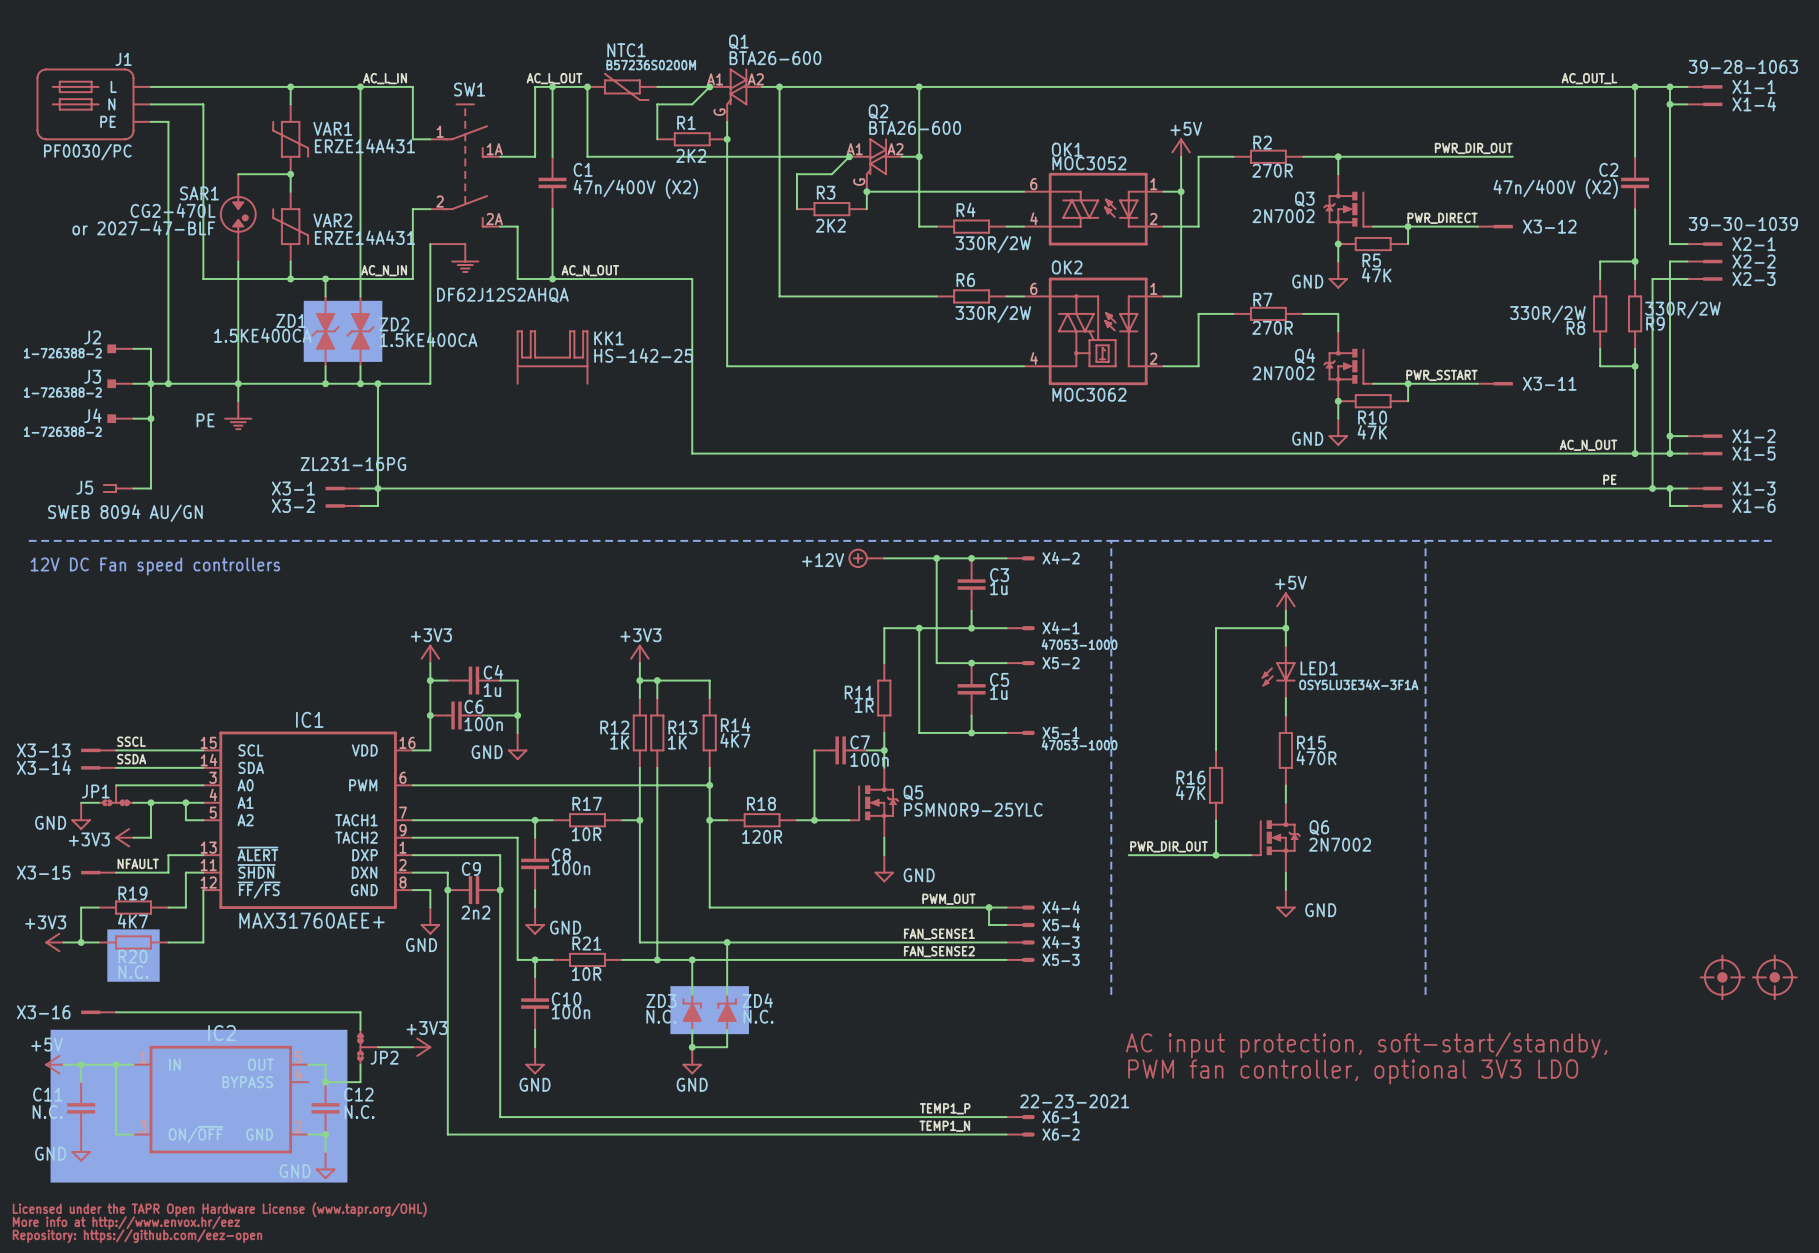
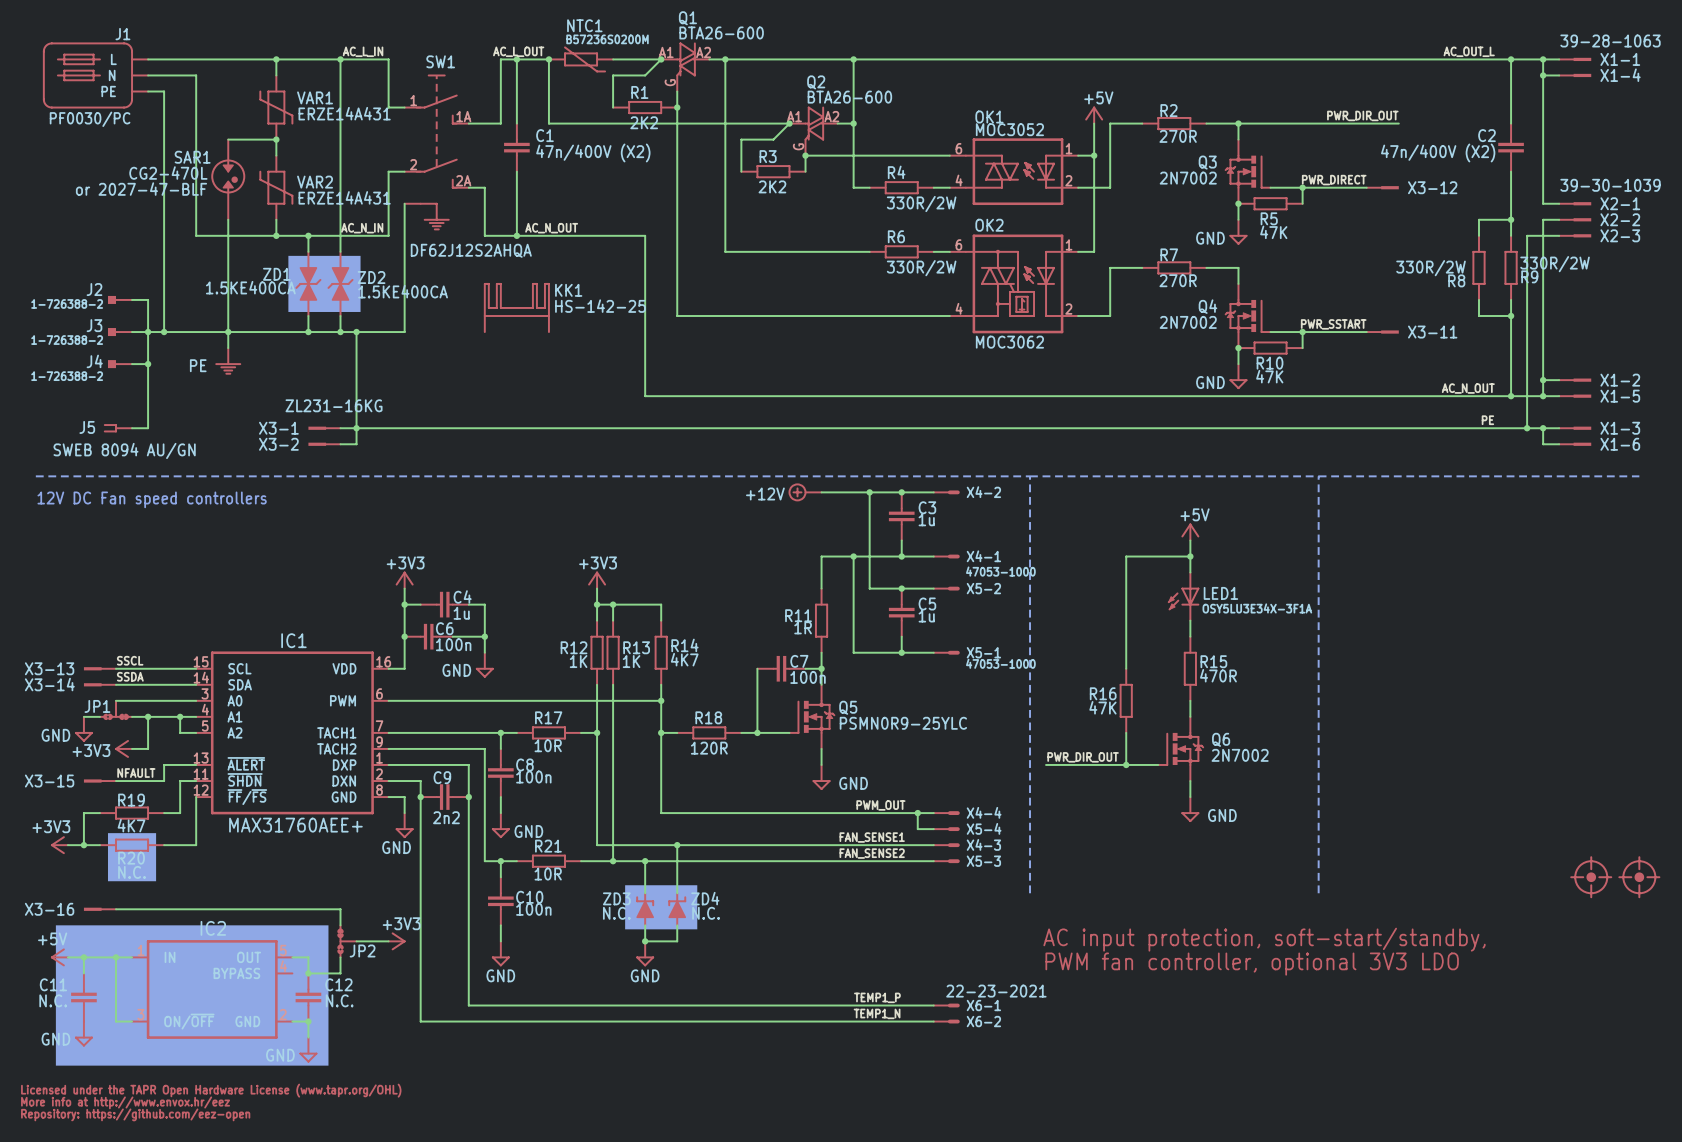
X3-1 value: ZL231-16PG (353, 464) -> ZL231-16KG (334, 405)

